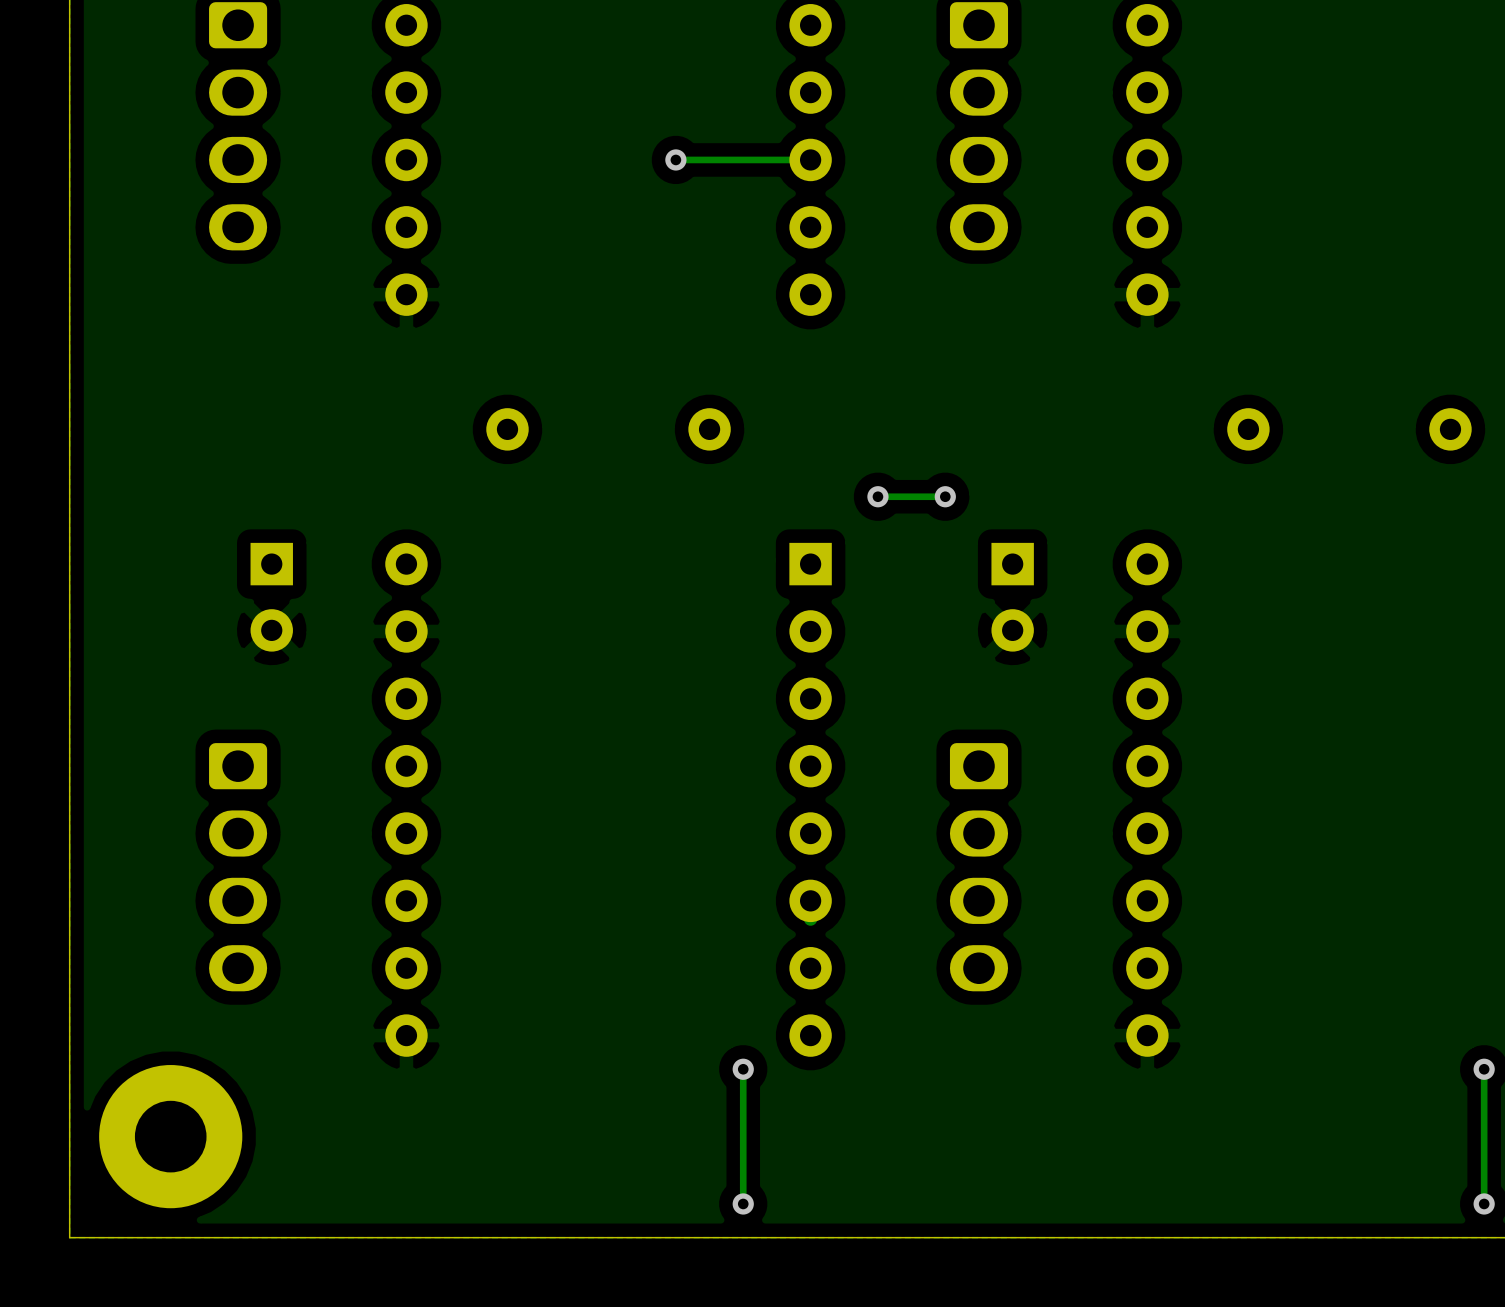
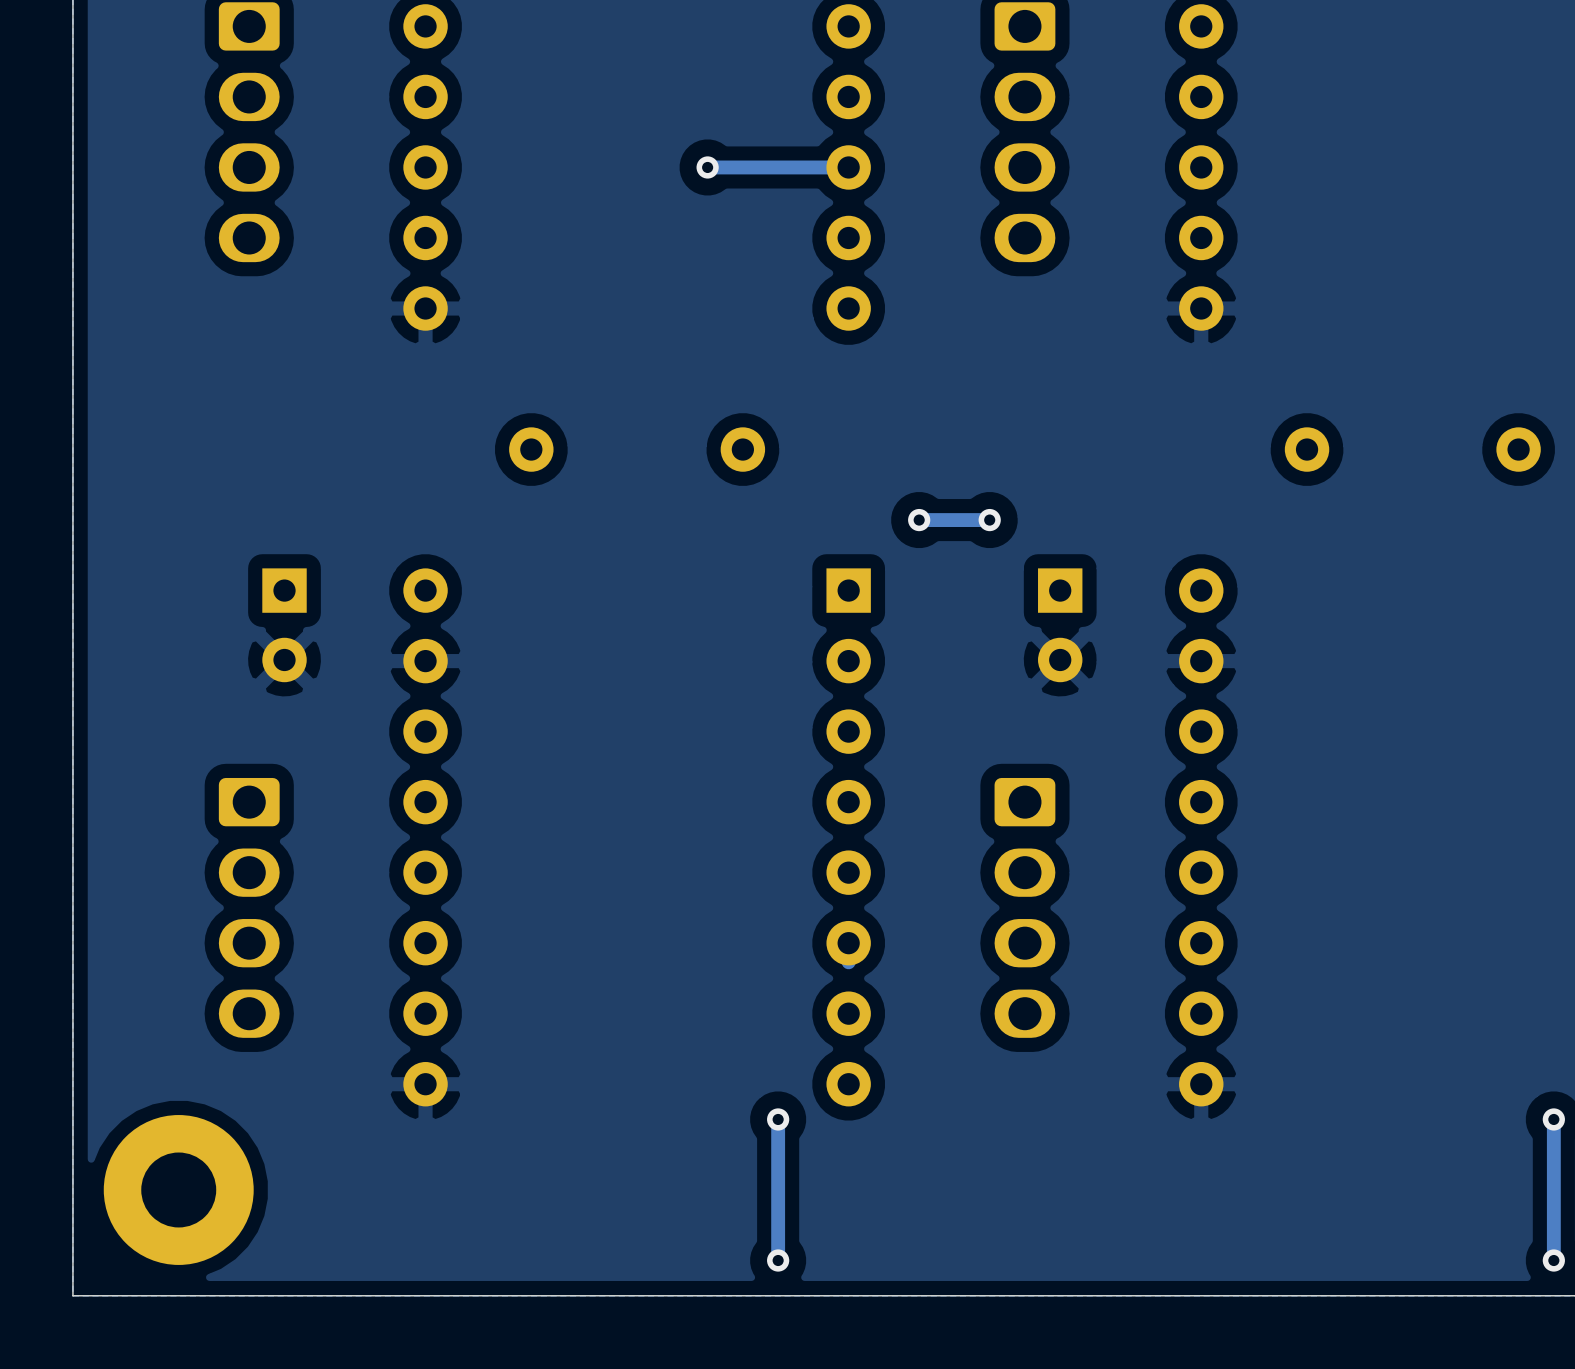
track width: thin (810, 159) (675, 159) -> thick (848, 167) (707, 167)
track width: thin (945, 496) (877, 496) -> thick (989, 520) (919, 520)
track width: thin (743, 1069) (743, 1203) -> thick (778, 1119) (778, 1260)
track width: thin (1484, 1069) (1484, 1203) -> thick (1553, 1119) (1553, 1260)

